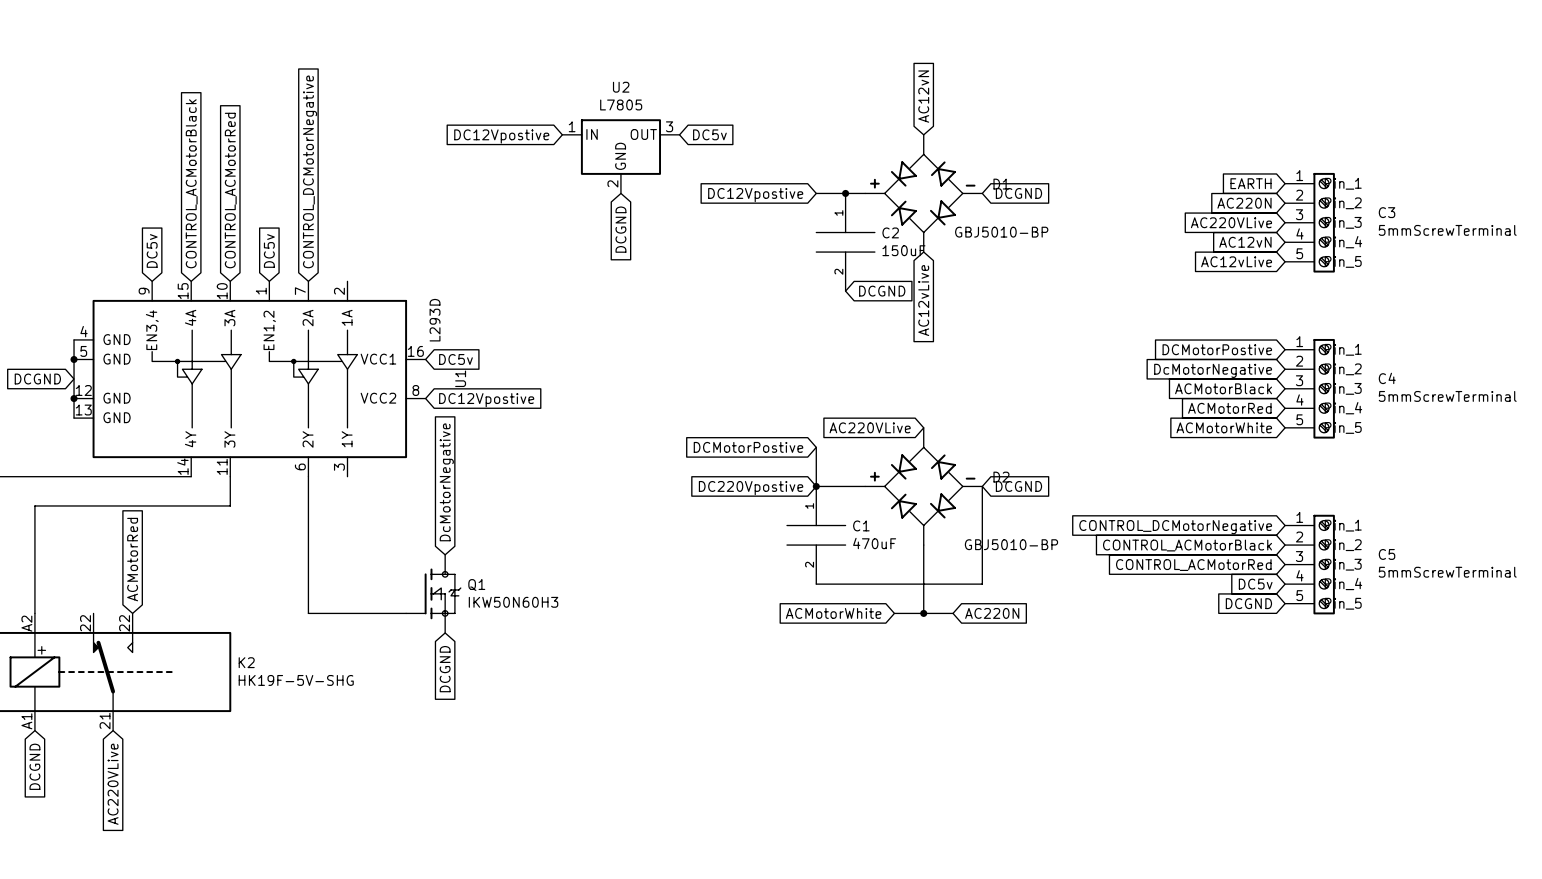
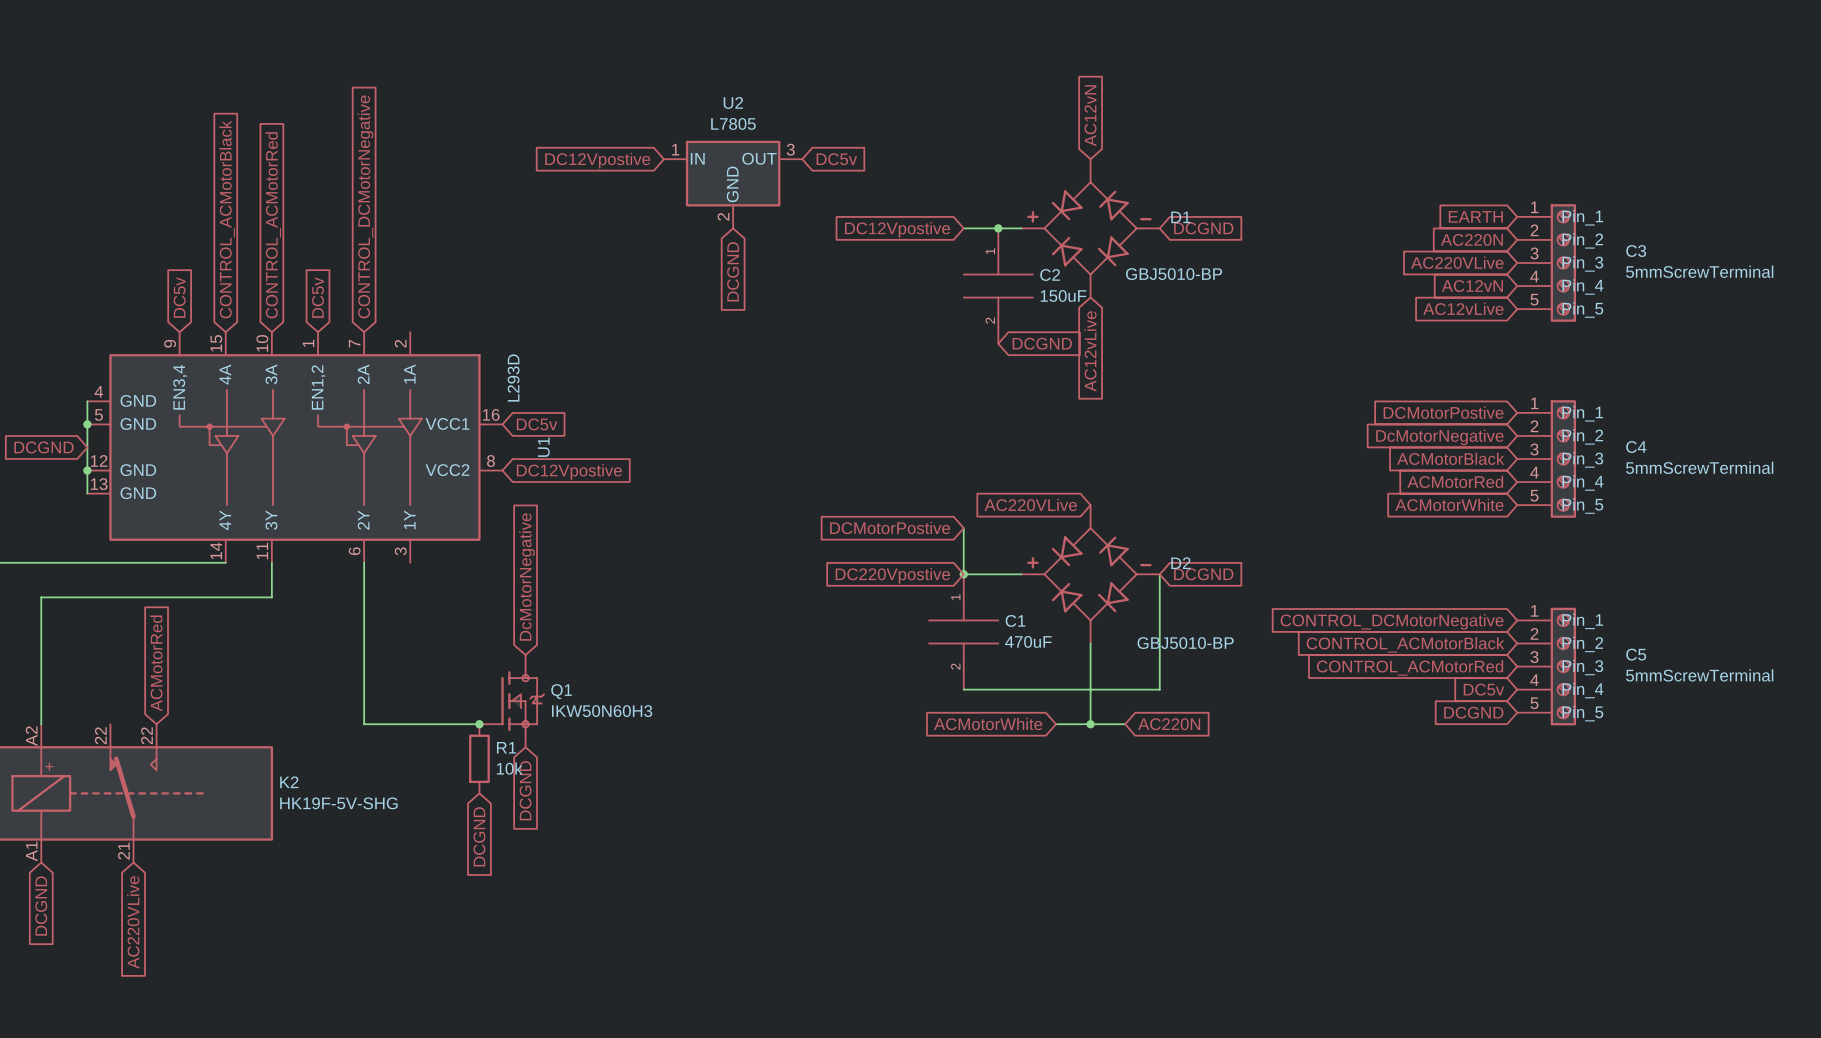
junction: none -> (479, 724)
R1: none -> 10k (479, 758)
global label: none -> DCGND (479, 836)

